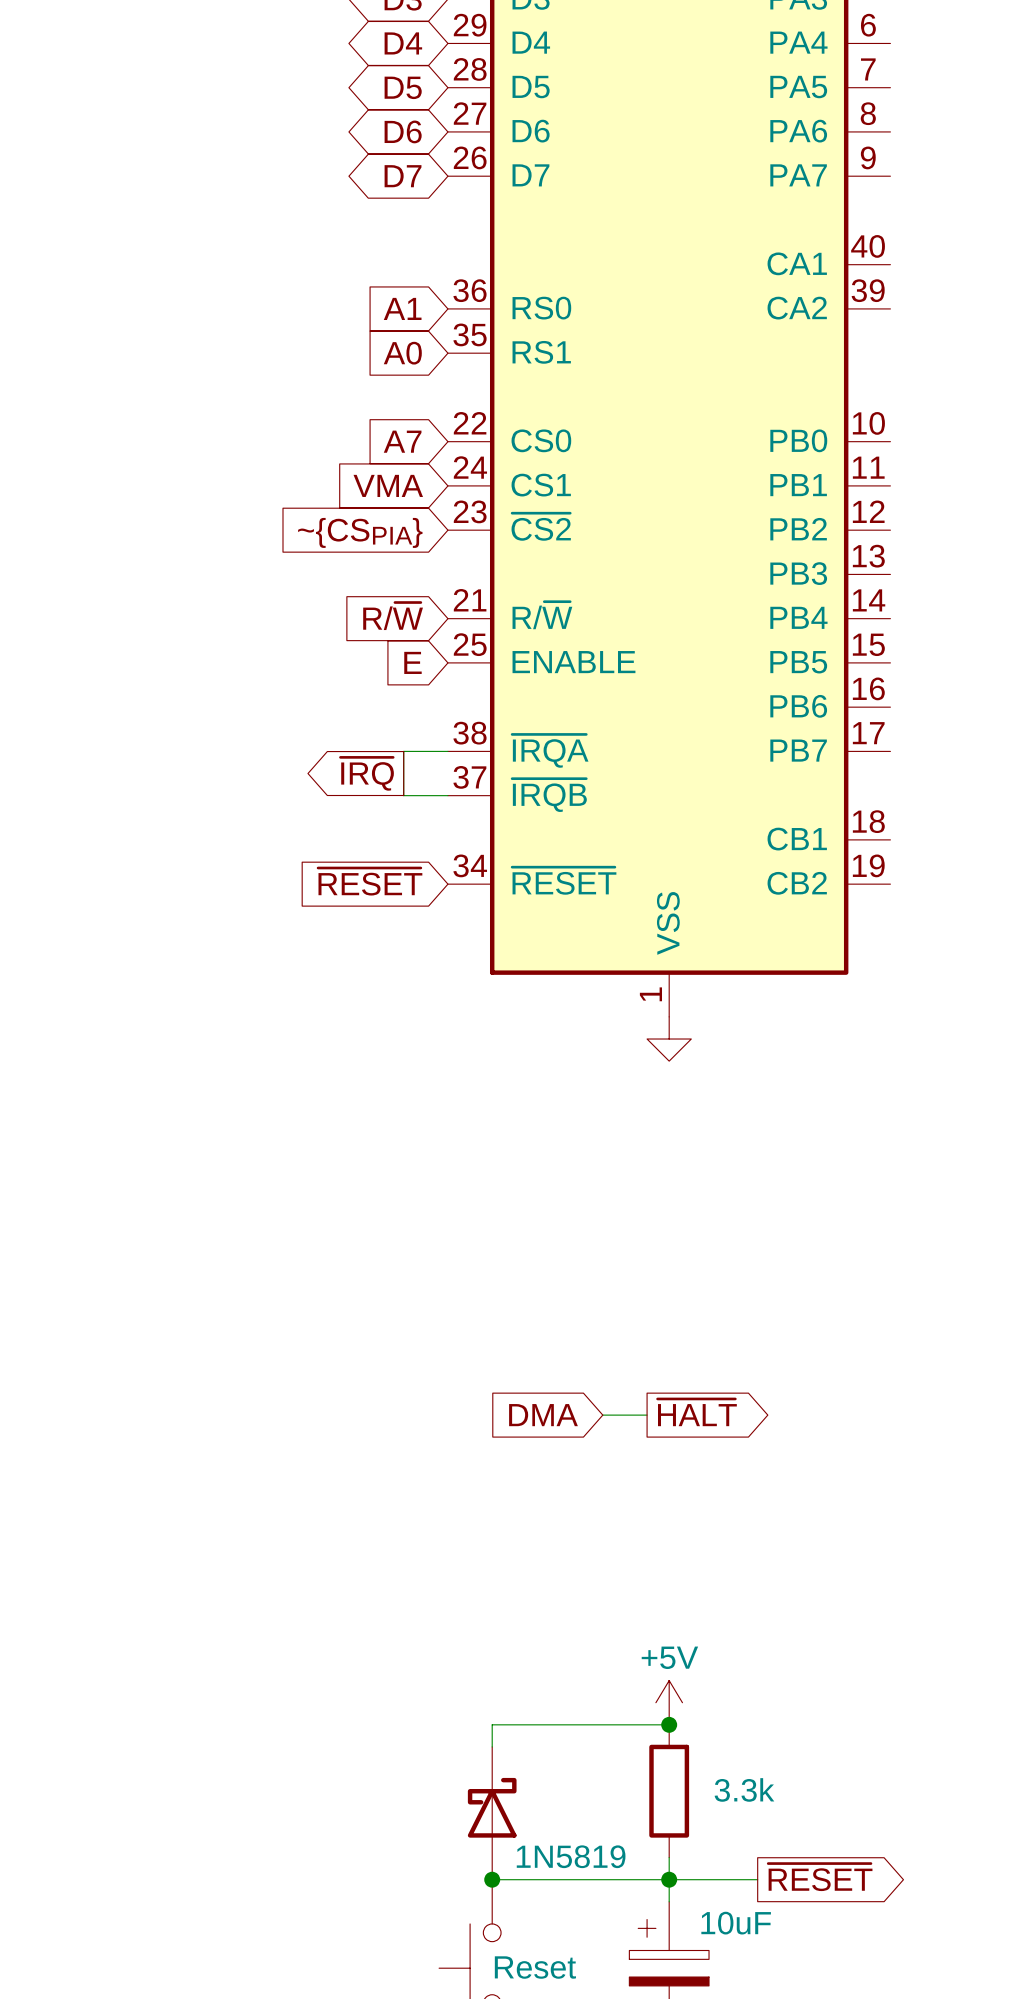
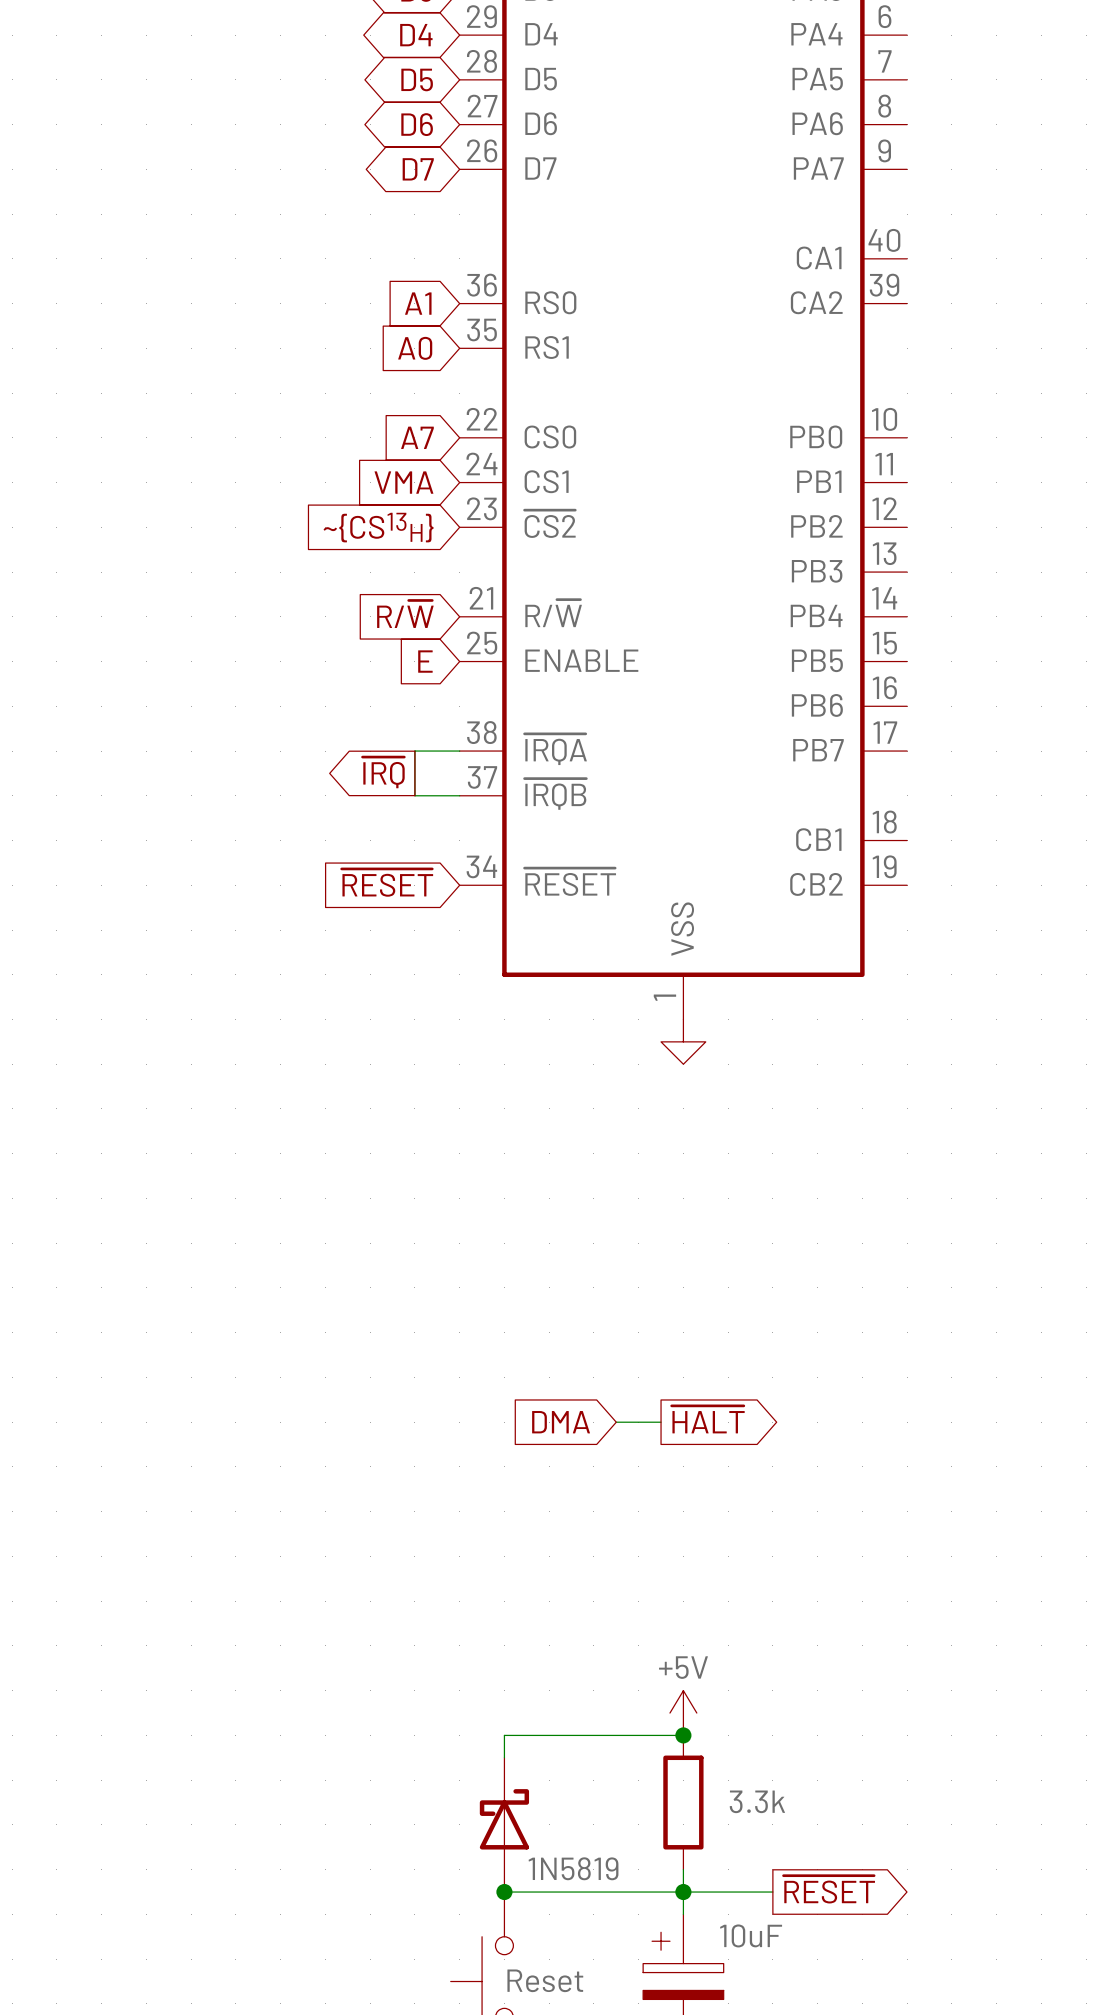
global label: ~{CSPIA} (360, 532) -> ~{CS13H} (378, 527)

